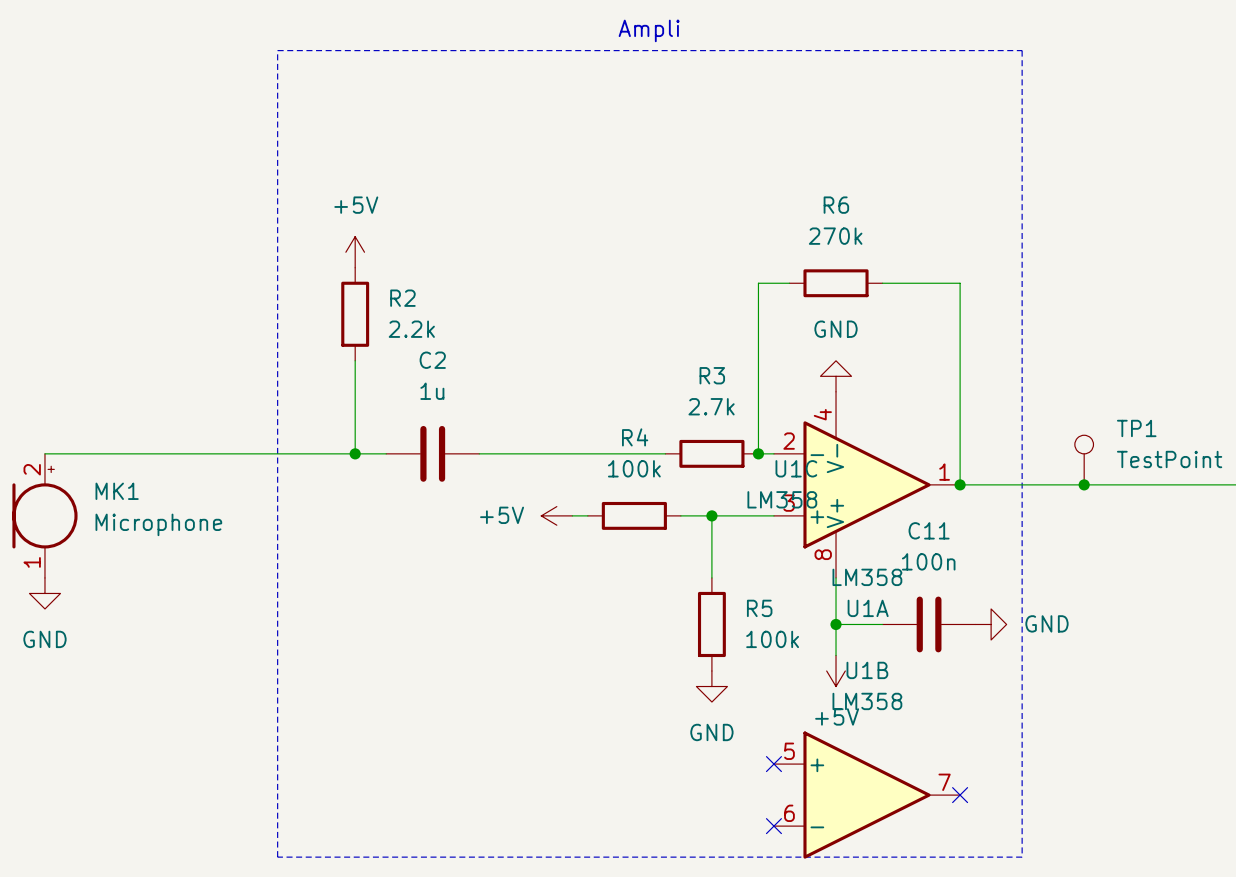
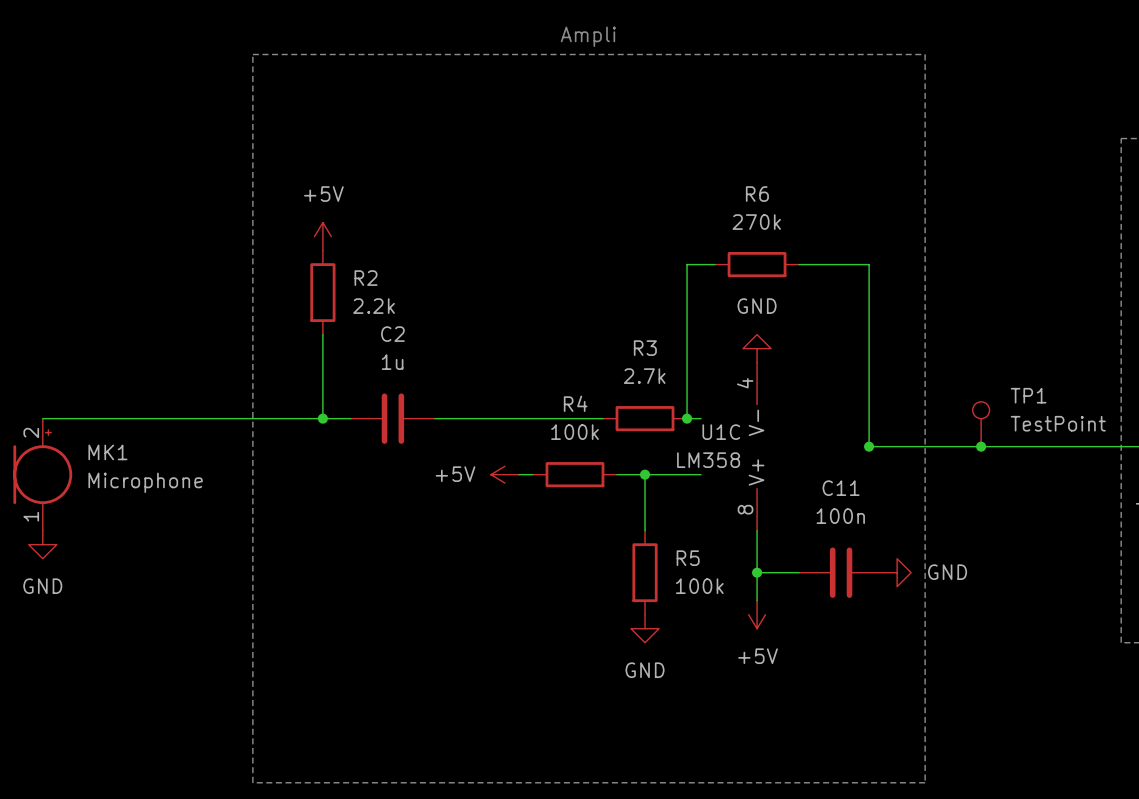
U1A: LM358 (867, 484) -> none
no-connect mark: (773, 764) -> none
U1B: LM358 (867, 795) -> none
no-connect mark: (960, 795) -> none
no-connect mark: (773, 826) -> none

